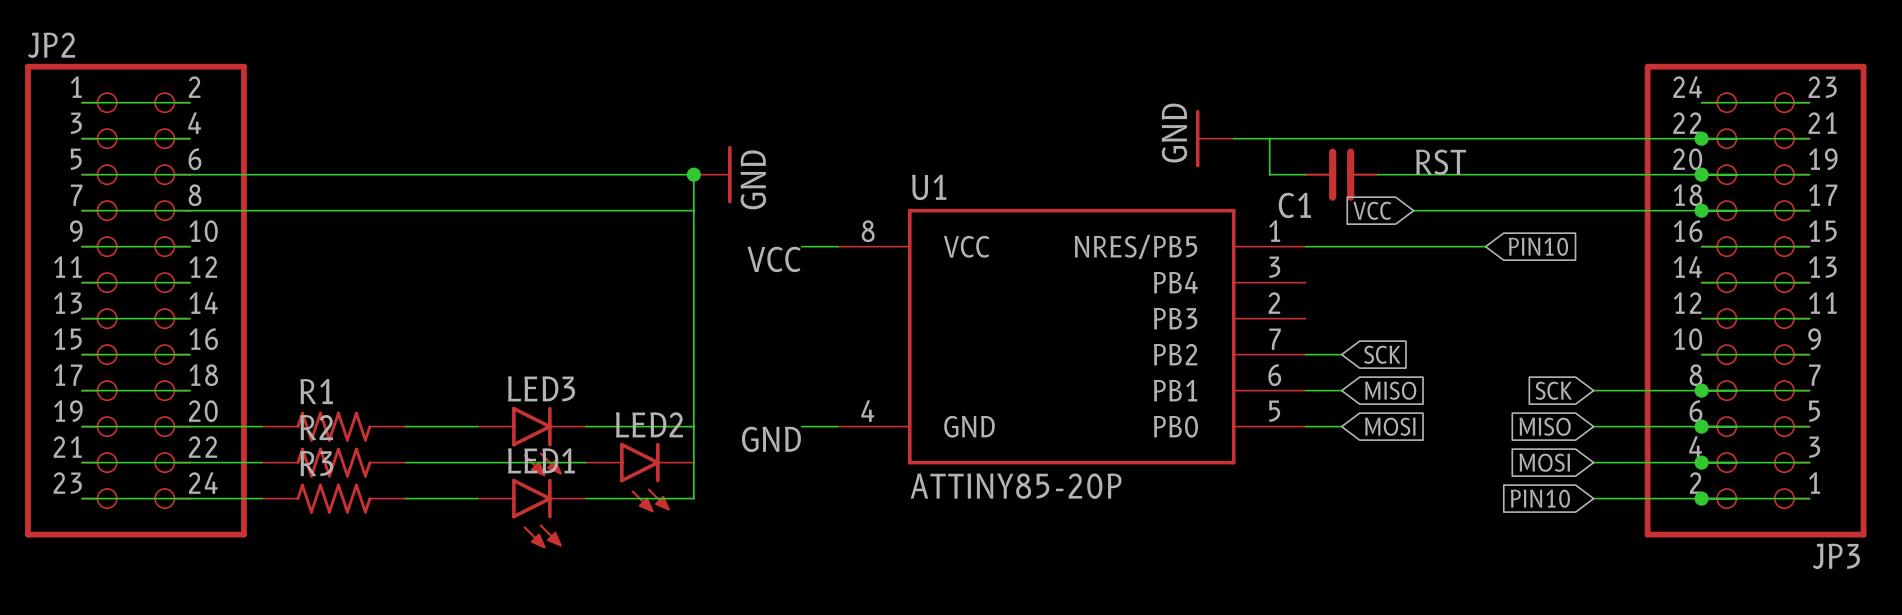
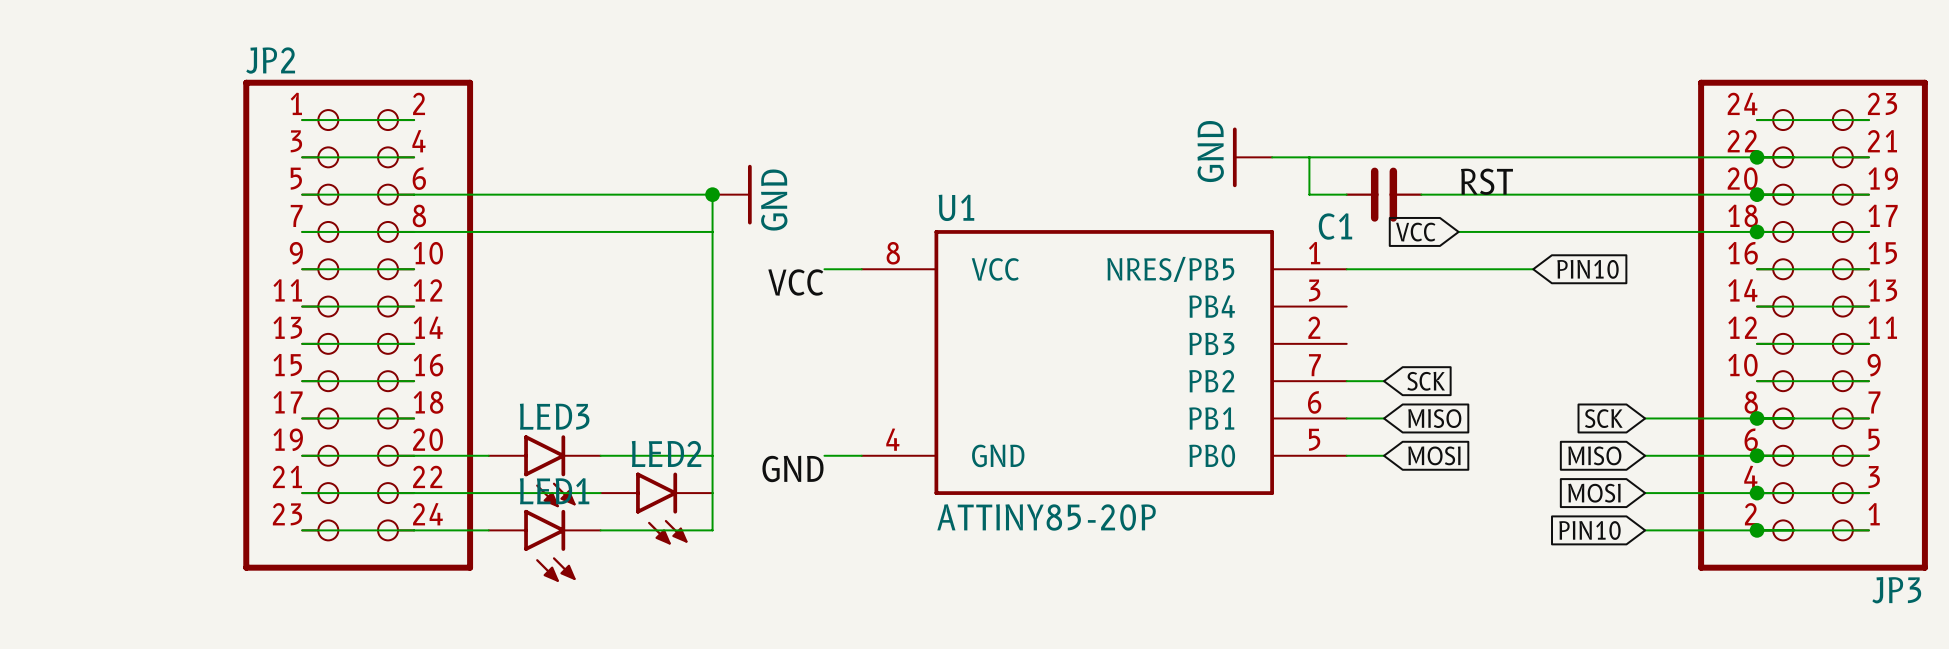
wire: (81, 102) (189, 102) -> (302, 120) (414, 120)
wire: (81, 138) (189, 138) -> (302, 157) (414, 157)
wire: (81, 174) (297, 174) -> none
wire: (81, 210) (297, 210) -> none
wire: (81, 246) (189, 246) -> (302, 269) (414, 269)
wire: (81, 282) (189, 282) -> (302, 306) (414, 306)
JP2 position: (135, 300) -> (358, 325)
wire: (81, 318) (189, 318) -> (302, 343) (414, 343)
wire: (81, 354) (189, 354) -> (302, 381) (414, 381)
wire: (81, 390) (189, 390) -> (302, 418) (414, 418)
wire: (81, 426) (261, 426) -> none
R1: (333, 426) -> none
wire: (81, 462) (261, 462) -> none
R2: (333, 462) -> none
wire: (81, 498) (261, 498) -> none
R3: (333, 498) -> none

